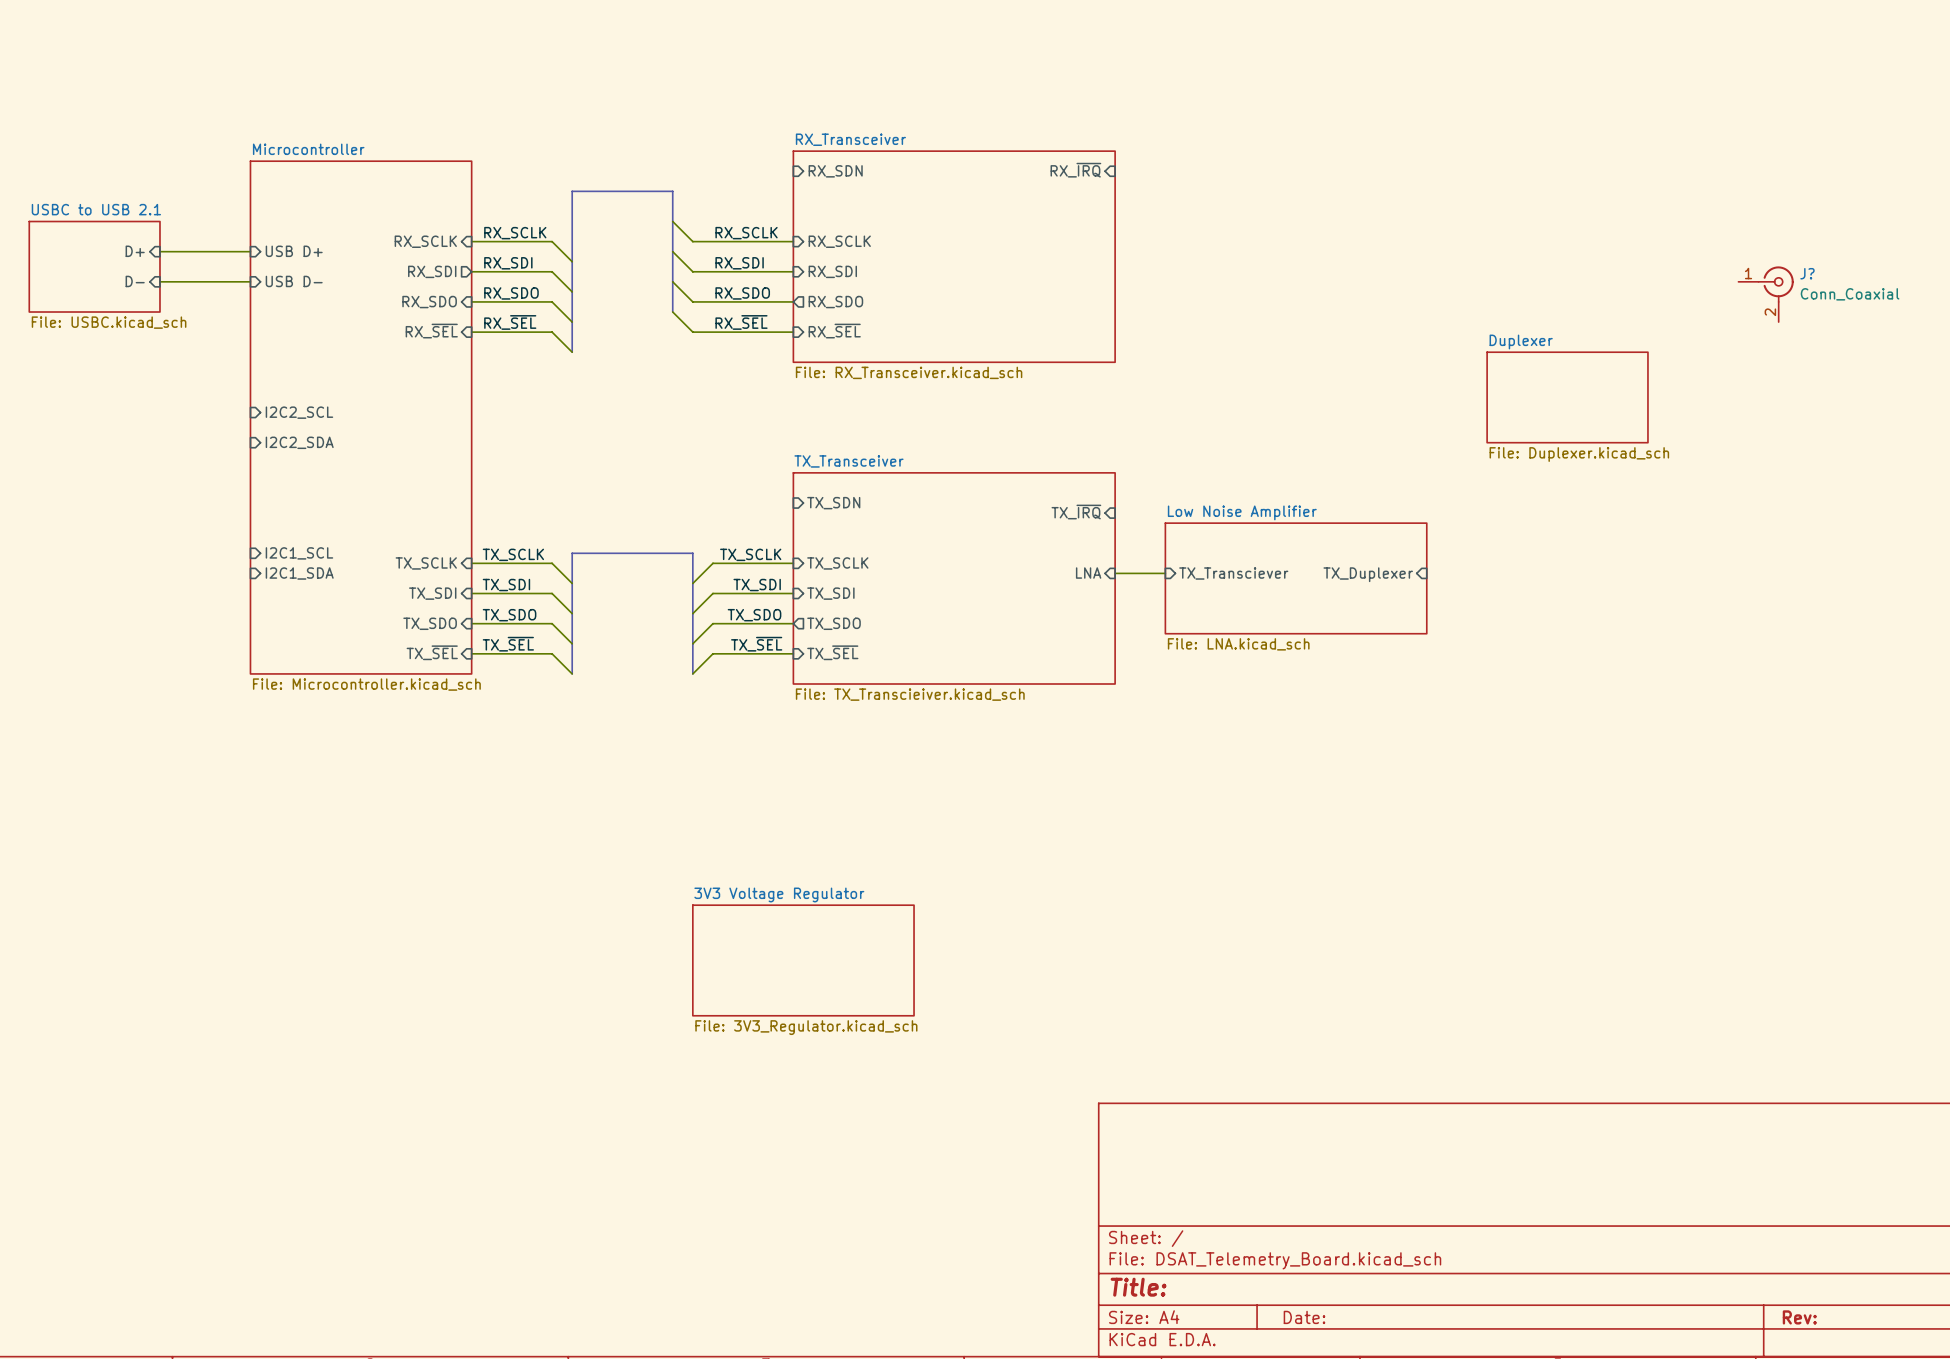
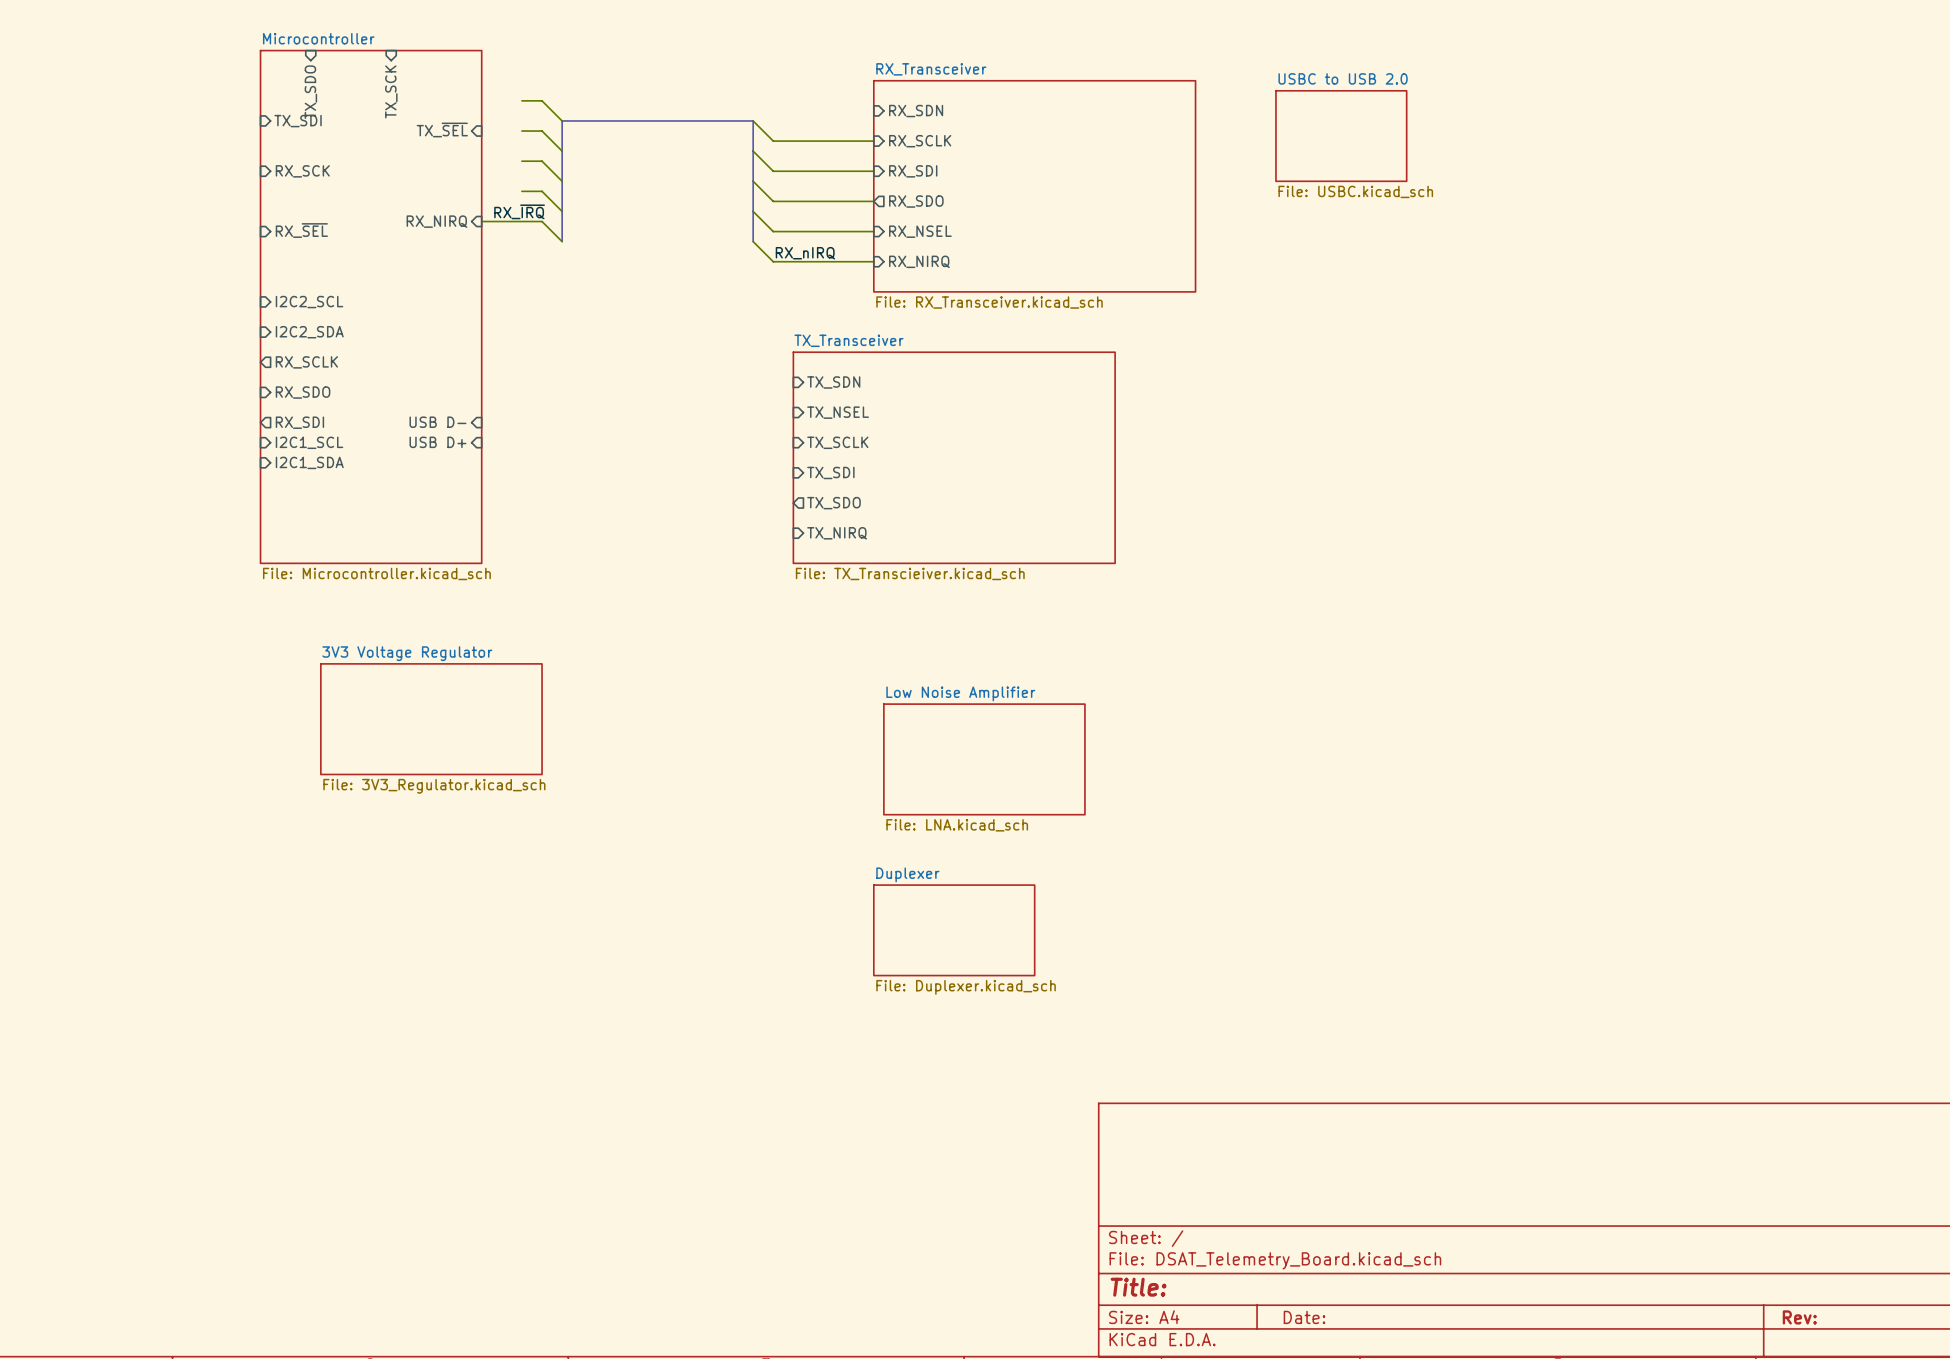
sheet pin: none -> TX_SCK (391, 91)
sheet pin: none -> TX_SDO (310, 92)
wire: none -> (521, 100) (542, 100) (562, 120)
wire: none -> (753, 120) (773, 141) (873, 141)
sheet pin: none -> TX_SDI (298, 121)
sheet pin: none -> TX_~{SEL} (442, 129)
wire: none -> (521, 131) (542, 131) (562, 151)
sheet USBC to USB 2.0: none -> File: USBC.kicad_sch (1341, 136)
wire: none -> (521, 161) (542, 161) (562, 181)
sheet pin: RX_~{IRQ} (1075, 170) -> none
sheet pin: none -> RX_SCK (302, 171)
sheet pin position: RX_SDN (835, 171) -> RX_SDN (916, 111)
wire: none -> (521, 191) (542, 191) (562, 211)
label: none -> RX_~{IRQ} (519, 211)
sheet pin: none -> RX_NIRQ (437, 221)
wire: none -> (481, 221) (542, 221) (562, 241)
wire: (672, 221) (692, 241) (793, 241) -> (753, 151) (773, 171) (873, 171)
sheet pin: none -> RX_~{SEL} (301, 230)
sheet pin: none -> RX_NSEL (920, 231)
label: RX_SCLK (515, 233) -> none
label: RX_SCLK (746, 233) -> none
sheet pin: RX_SCLK (425, 241) -> none
wire: (471, 241) (552, 241) (572, 261) -> none
bus: none -> (562, 241) (562, 120) (753, 120) (753, 241)
sheet pin position: RX_SCLK (839, 241) -> RX_SCLK (920, 141)
sheet pin: D+ (135, 251) -> none
wire: (159, 251) (250, 251) -> none
sheet pin: USB D+ (294, 251) -> none
wire: (672, 251) (692, 271) (793, 271) -> (753, 181) (773, 201) (873, 201)
sheet RX_Transceiver position: (954, 256) -> (1034, 186)
sheet pin: none -> RX_NIRQ (919, 261)
label: RX_SDI (508, 263) -> none
label: RX_SDI (739, 263) -> RX_nIRQ (805, 253)
sheet USBC to USB 2.1: File: USBC.kicad_sch (94, 266) -> none
sheet pin: RX_SDI (432, 271) -> none
wire: (471, 271) (552, 271) (572, 291) -> none
sheet pin position: RX_SDI (832, 271) -> RX_SDI (913, 171)
sheet pin: D- (135, 281) -> none
wire: (159, 281) (250, 281) -> none
sheet pin: USB D- (294, 281) -> none
wire: (672, 281) (692, 301) (793, 301) -> (753, 211) (773, 231) (873, 231)
label: RX_SDO (511, 293) -> none
label: RX_SDO (742, 293) -> none
J?: Conn_Coaxial (1766, 294) -> none
wire: (471, 301) (552, 301) (572, 322) -> none
sheet pin: RX_SDO (429, 302) -> none
sheet pin position: RX_SDO (835, 302) -> RX_SDO (916, 201)
wire: (672, 312) (692, 332) (793, 332) -> (753, 241) (773, 261) (873, 261)
bus: (672, 312) (672, 191) (572, 191) (572, 352) -> none
label: RX_~{SEL} (510, 322) -> none
label: RX_~{SEL} (741, 322) -> none
sheet pin: RX_~{SEL} (431, 331) -> none
sheet pin: RX_~{SEL} (834, 331) -> none
wire: (471, 332) (552, 332) (572, 352) -> none
sheet pin: none -> RX_SCLK (306, 362)
sheet pin: none -> TX_SDN (833, 382)
sheet pin: none -> RX_SDO (303, 392)
sheet Duplexer: File: Duplexer.kicad_sch (1567, 397) -> none
sheet pin position: I2C2_SCL (299, 412) -> I2C2_SCL (309, 302)
sheet pin: none -> TX_NSEL (838, 412)
sheet Microcontroller position: (361, 417) -> (371, 306)
sheet pin: none -> RX_SDI (299, 422)
sheet pin: none -> USB D- (437, 422)
sheet pin position: I2C2_SDA (299, 442) -> I2C2_SDA (309, 332)
sheet pin: none -> USB D+ (437, 442)
sheet pin shape: input (833, 503) -> output (833, 503)
sheet pin: TX_SDN (833, 503) -> TX_SDO (833, 503)
sheet pin: TX_~{IRQ} (1076, 512) -> none
sheet pin: none -> TX_NIRQ (837, 533)
sheet pin position: I2C1_SCL (299, 553) -> I2C1_SCL (309, 442)
label: TX_SCLK (513, 554) -> none
label: TX_SCLK (750, 554) -> none
sheet pin: TX_SCLK (426, 563) -> none
wire: (471, 563) (552, 563) (572, 583) -> none
wire: (793, 563) (712, 563) (692, 583) -> none
sheet pin position: TX_SCLK (837, 563) -> TX_SCLK (837, 442)
sheet pin position: I2C1_SDA (299, 573) -> I2C1_SDA (309, 462)
sheet pin: LNA (1088, 573) -> none
wire: (1115, 573) (1165, 573) -> none
sheet pin: TX_Transciever (1233, 573) -> none
sheet pin: TX_Duplexer (1368, 574) -> none
sheet TX_Transceiver position: (954, 578) -> (954, 457)
sheet Low Noise Amplifier: File: LNA.kicad_sch (1296, 578) -> none
label: TX_SDI (506, 585) -> none
label: TX_SDI (757, 585) -> none
sheet pin: TX_SDI (432, 593) -> none
wire: (471, 593) (552, 593) (572, 613) -> none
wire: (793, 593) (712, 593) (692, 613) -> none
sheet pin position: TX_SDI (830, 593) -> TX_SDI (830, 472)
label: TX_SDO (509, 615) -> none
label: TX_SDO (754, 615) -> none
sheet pin: TX_SDO (430, 623) -> none
wire: (471, 623) (552, 623) (572, 643) -> none
wire: (793, 623) (712, 623) (692, 643) -> none
sheet pin: TX_SDO (833, 623) -> none
label: TX_~{SEL} (508, 644) -> none
label: TX_~{SEL} (756, 644) -> none
sheet pin: TX_~{SEL} (432, 652) -> none
sheet pin: TX_~{SEL} (832, 652) -> none
wire: (471, 653) (552, 653) (572, 673) -> none
wire: (793, 653) (712, 653) (692, 673) -> none
bus: (572, 673) (572, 553) (692, 553) (692, 673) -> none
sheet Low Noise Amplifier: none -> File: LNA.kicad_sch (984, 759)
sheet Duplexer: none -> File: Duplexer.kicad_sch (954, 930)
sheet 3V3 Voltage Regulator position: (803, 960) -> (431, 719)

